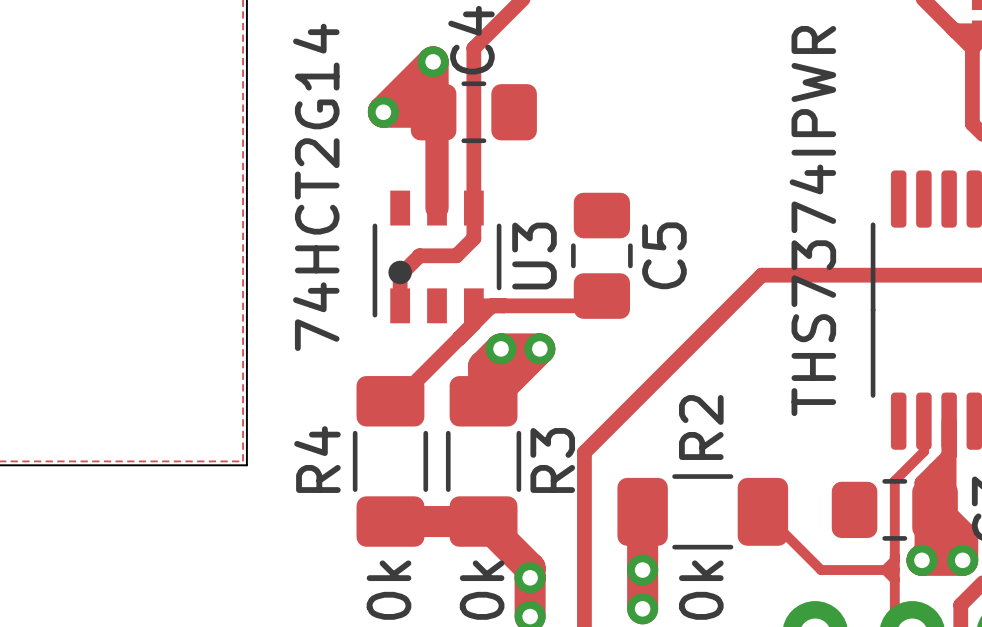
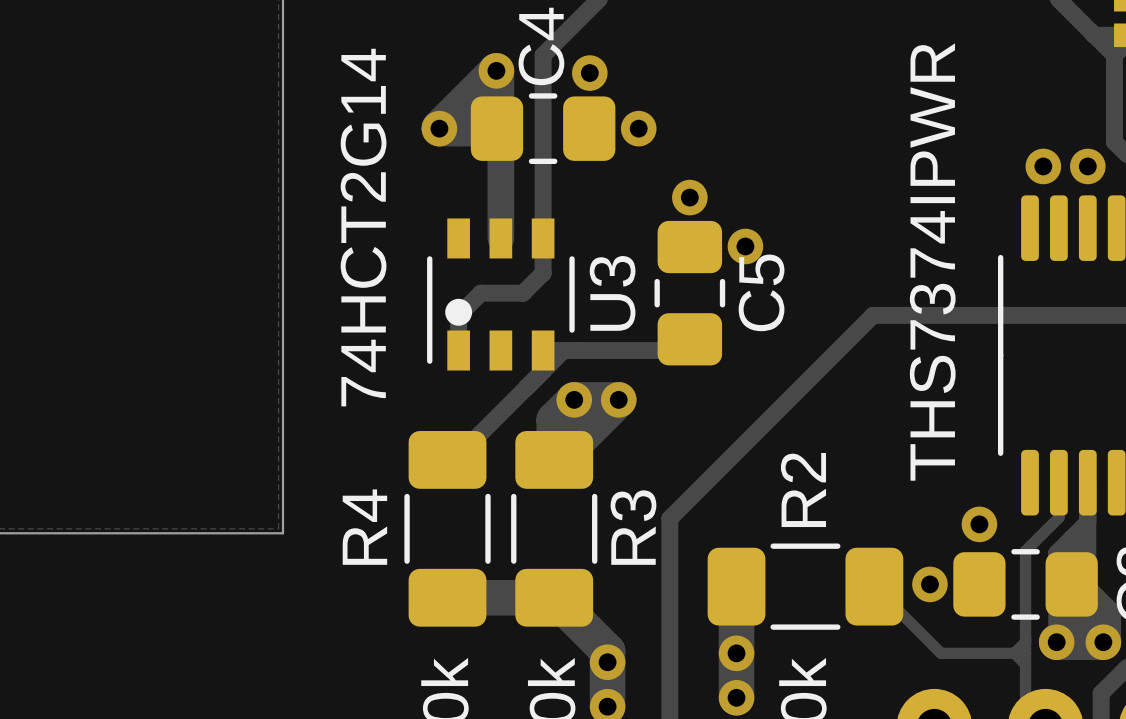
via: none -> (589, 73)
via: none -> (638, 128)
via: none -> (1043, 166)
via: none -> (1087, 166)
via: none -> (689, 197)
via: none -> (745, 246)
via: none -> (979, 524)
via: none -> (929, 584)

